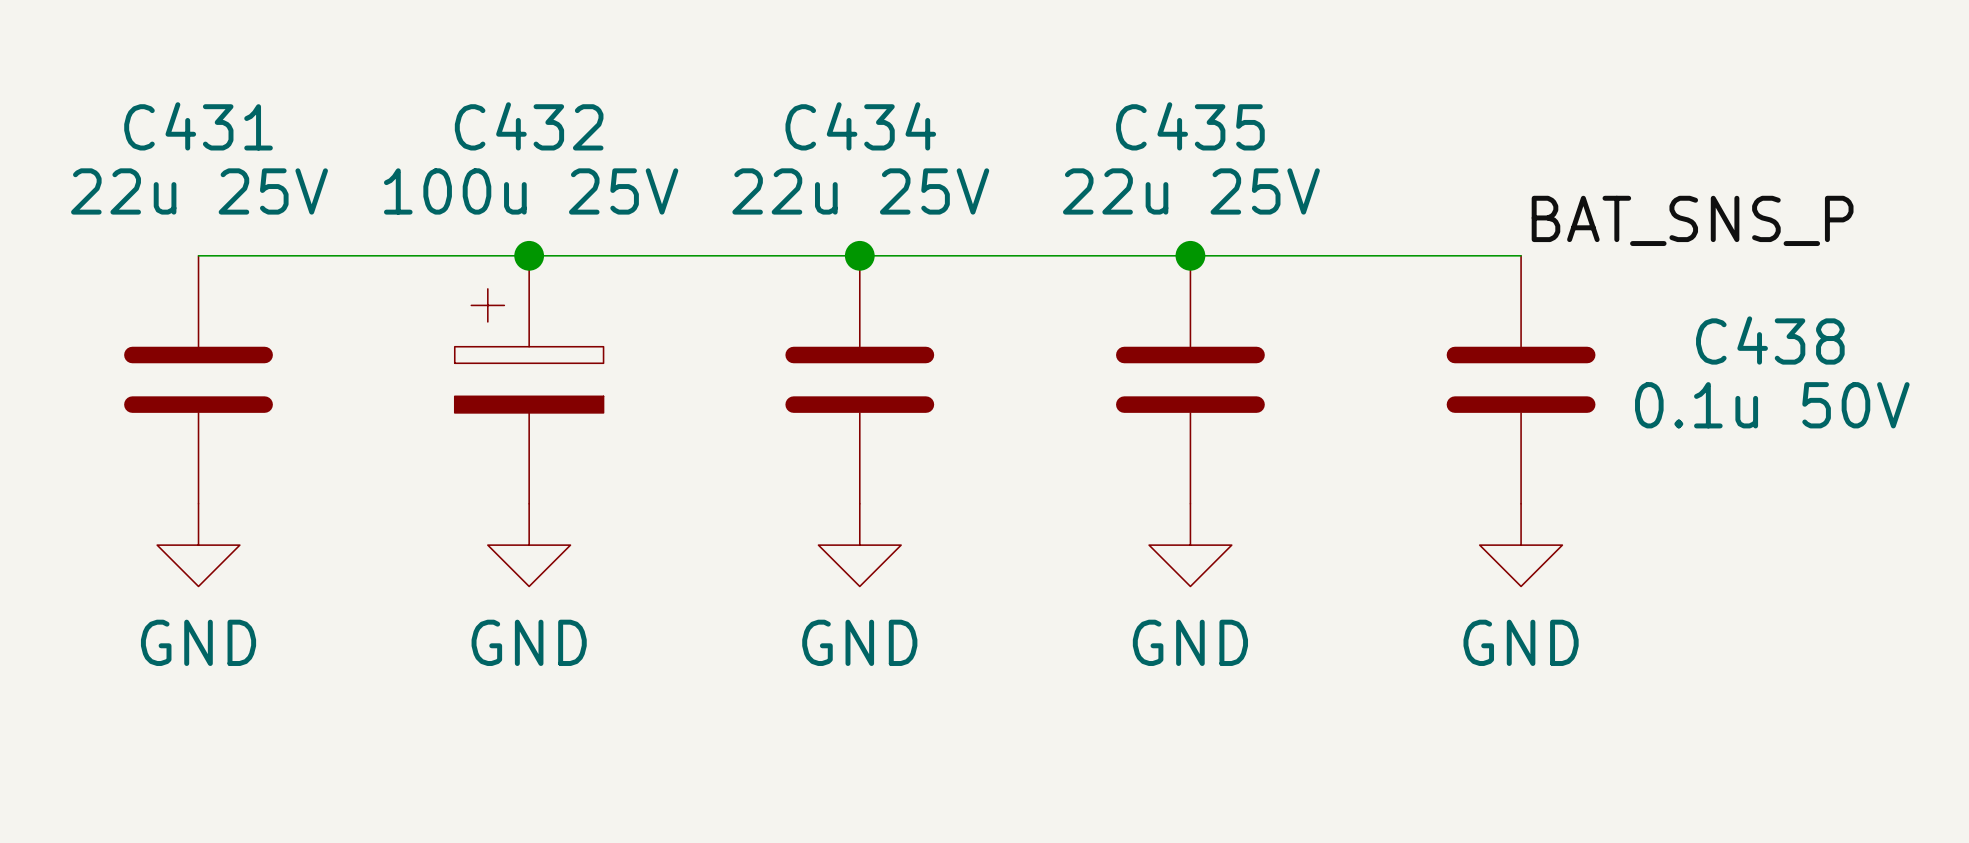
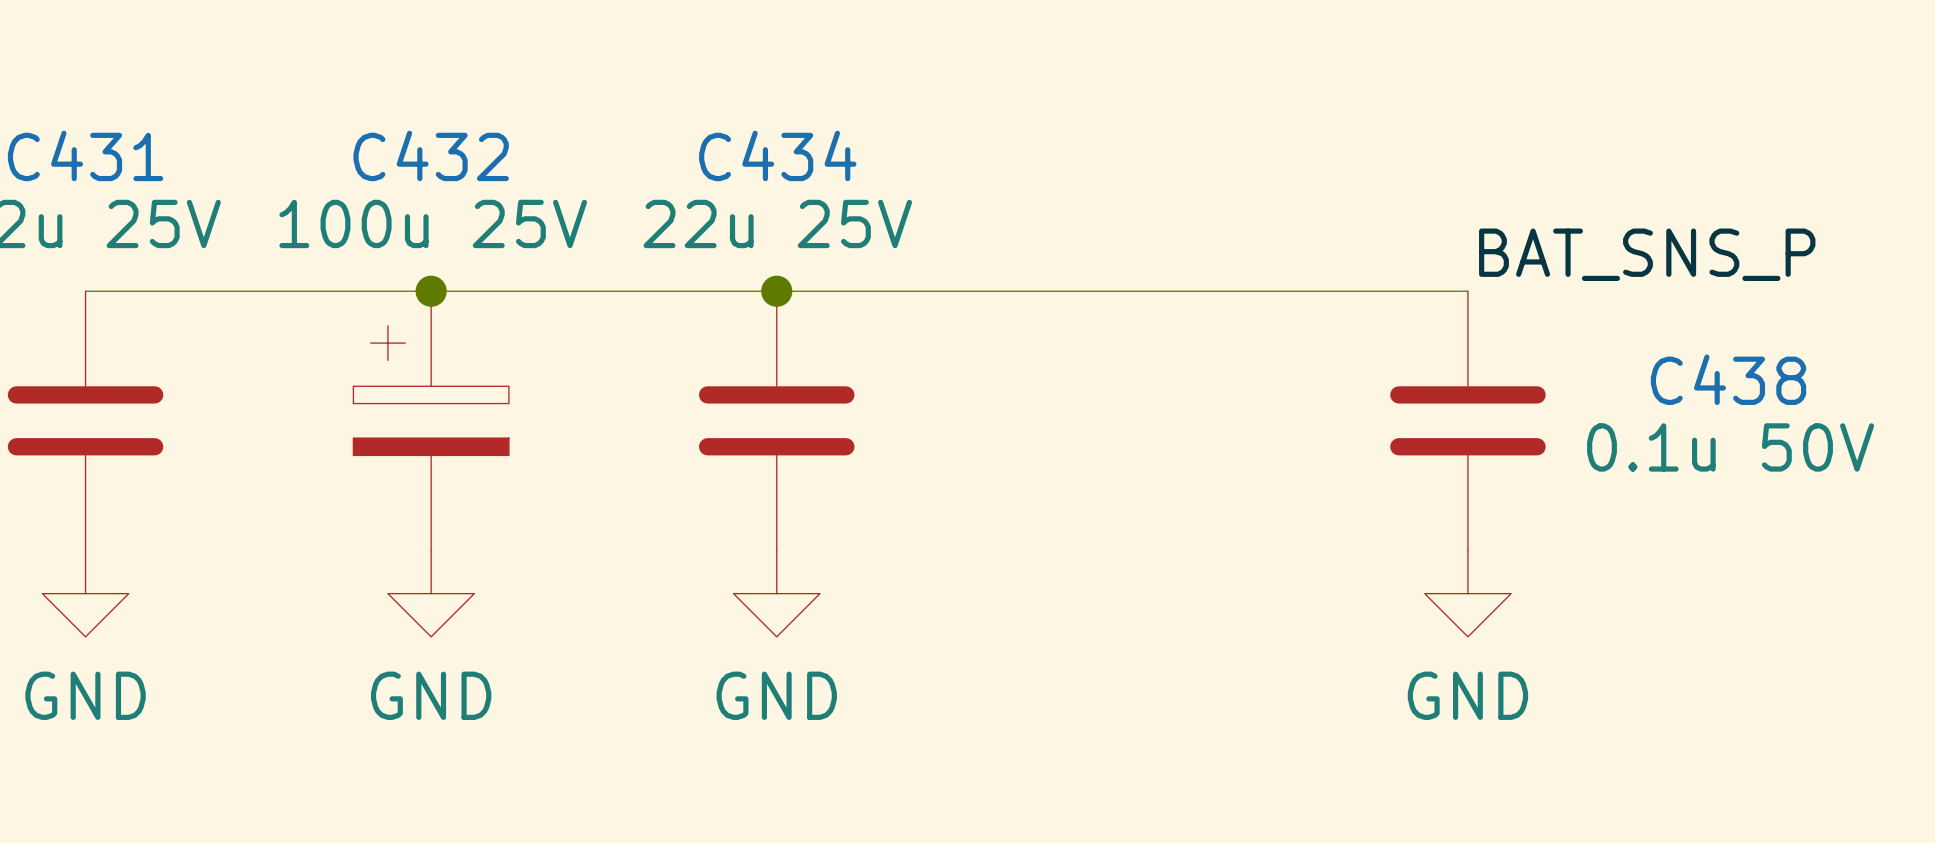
junction: (1190, 255) -> none
C435: 22u 25V (1190, 379) -> none
power symbol: GND (1190, 545) -> none

